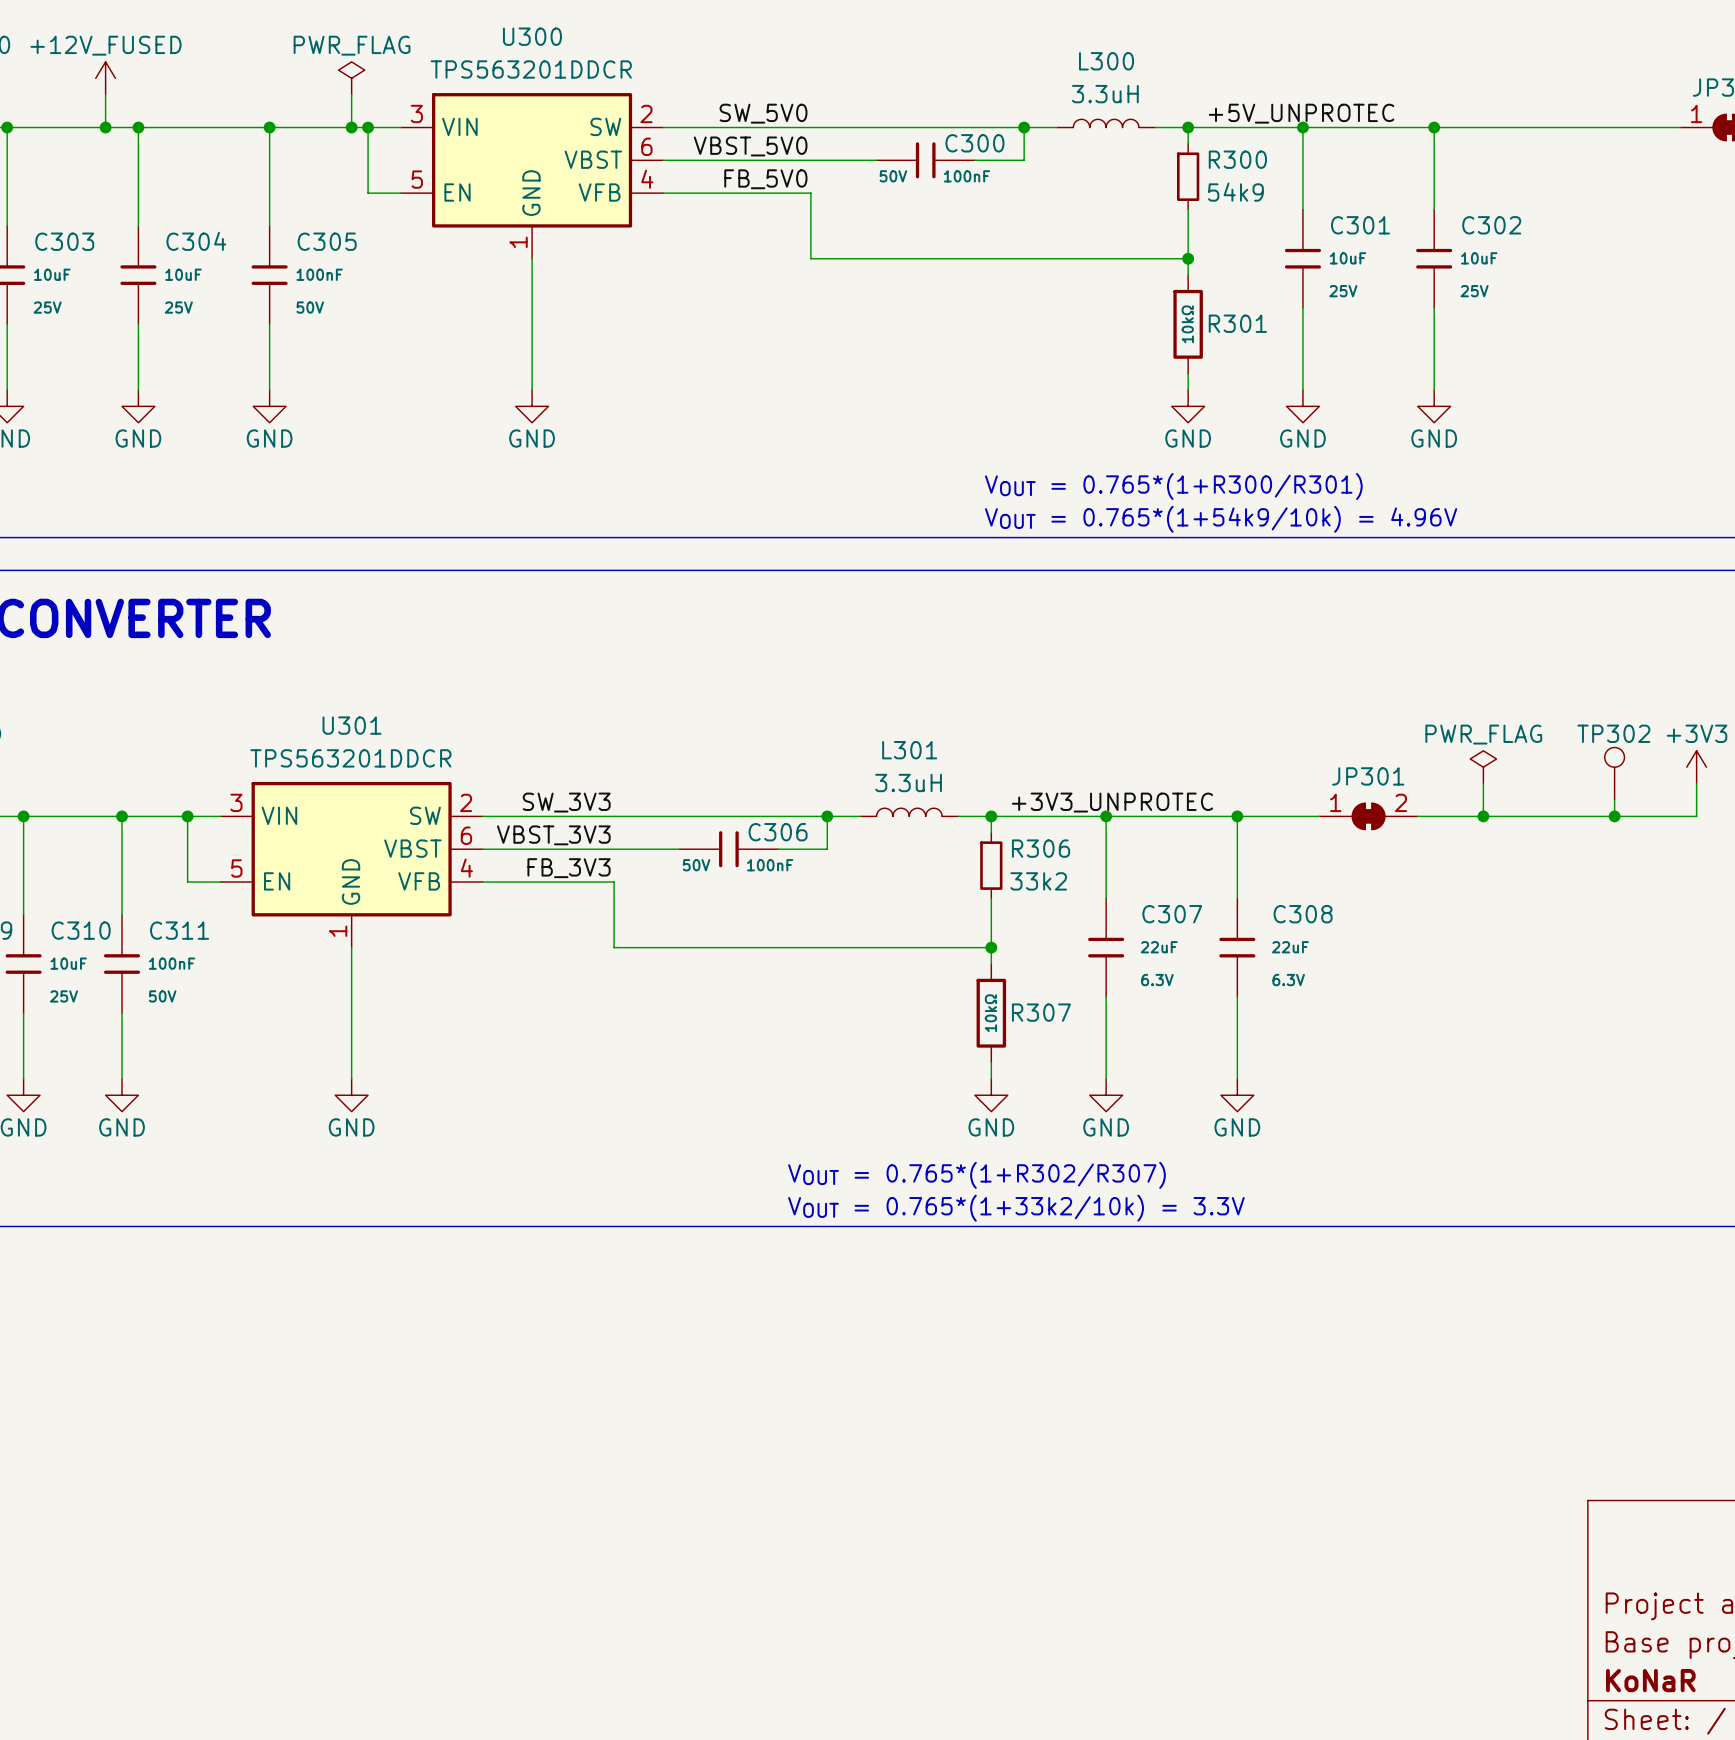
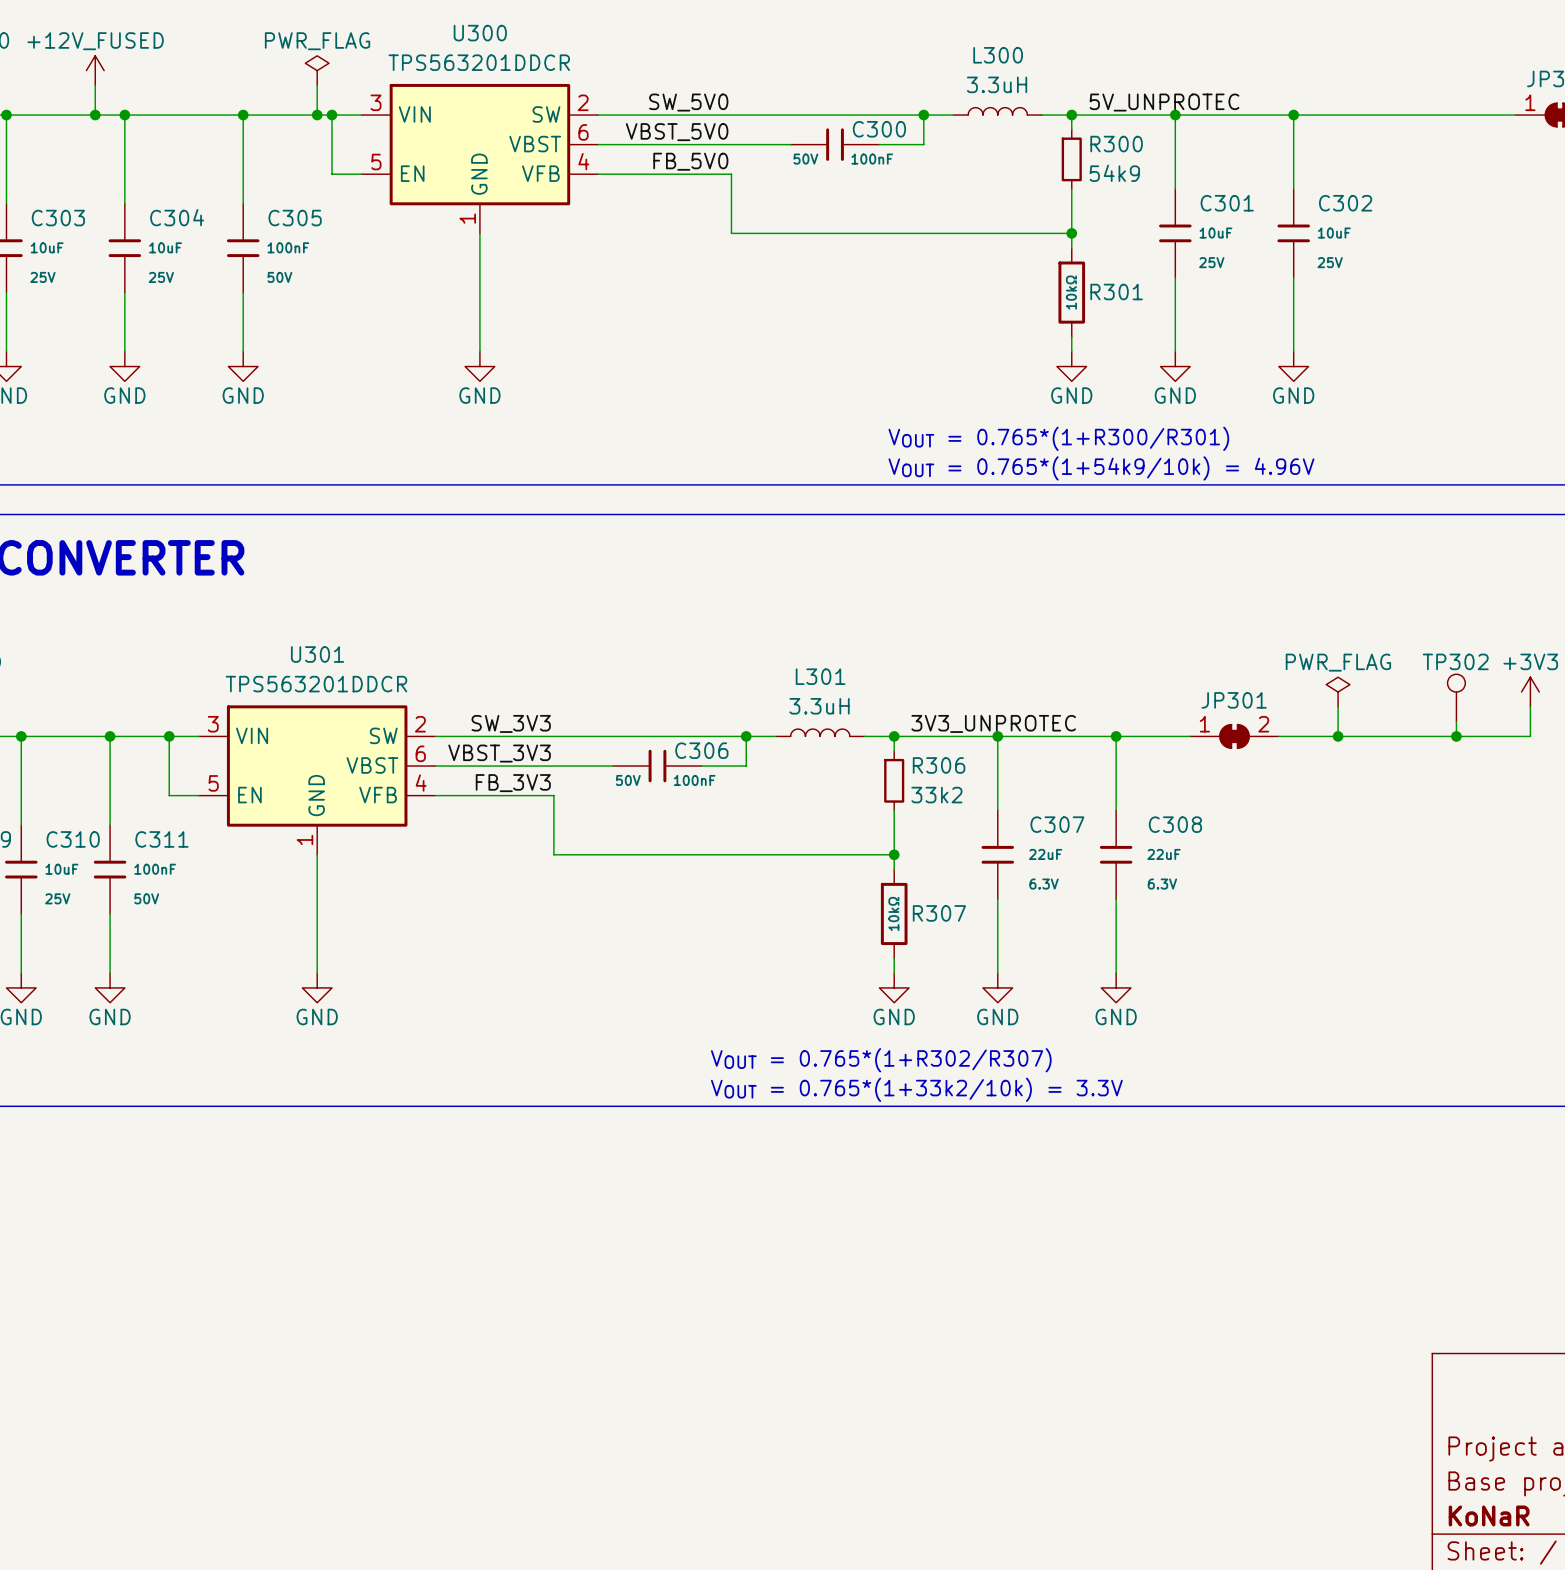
label: +5V_UNPROTEC (1301, 113) -> 5V_UNPROTEC (1164, 102)
label: +3V3_UNPROTEC (1112, 802) -> 3V3_UNPROTEC (993, 723)

